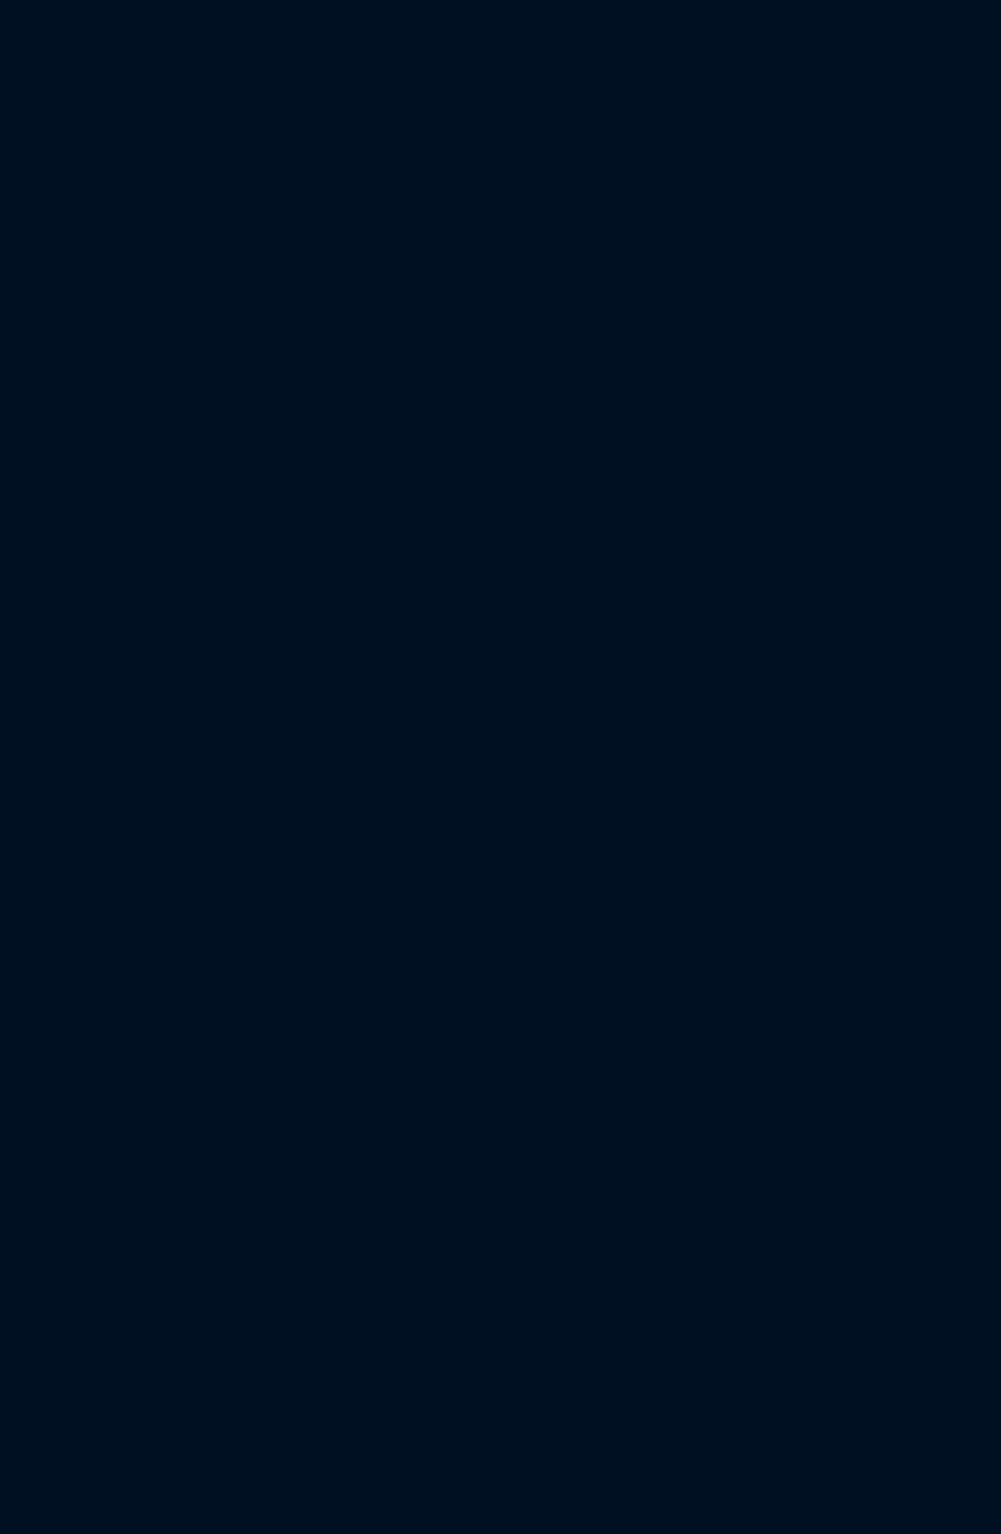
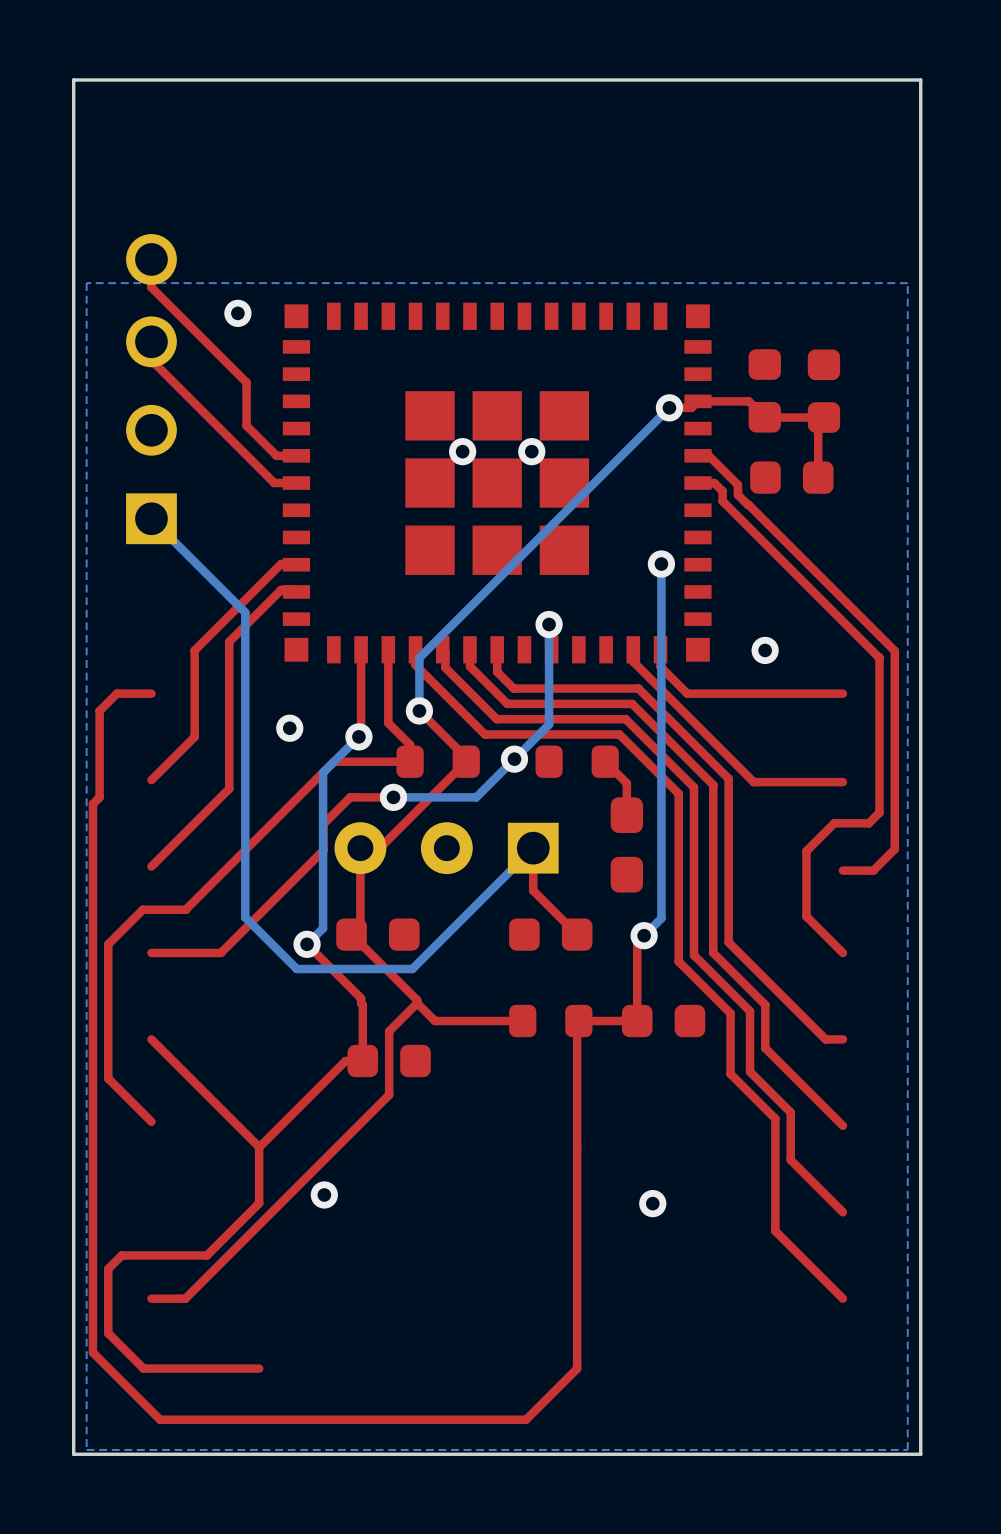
board edge: none -> (920, 80) (73, 80) (73, 1454) (920, 1454) (920, 80)
top track: none -> (151, 259) (151, 287) (246, 382) (246, 425) (276, 455) (296, 455)
bottom zone outline: none -> (907, 283) (907, 1449) (86, 1449) (86, 283) (907, 283)
via: none -> (237, 313)
top track: none -> (151, 341) (151, 360) (274, 483) (296, 483)
part: none -> (151, 389)
part: none -> (764, 390)
part: none -> (823, 391)
top track: none -> (669, 407) (691, 407) (697, 401) (748, 401) (765, 417) (823, 417) (818, 423) (818, 477)
bottom track: none -> (669, 407) (419, 657) (419, 710)
via: none -> (669, 407)
via: none -> (462, 451)
via: none -> (531, 451)
top track: none -> (697, 455) (708, 455) (737, 484) (737, 494) (894, 650) (894, 849) (873, 870) (842, 870)
part: none -> (791, 477)
part: none -> (497, 483)
top track: none -> (697, 483) (714, 483) (722, 491) (722, 501) (879, 658)
bottom track: none -> (151, 518) (245, 612) (245, 917) (296, 968) (412, 968) (533, 848)
top track: none -> (296, 564) (281, 564) (194, 650) (194, 736) (151, 780)
bottom track: none -> (661, 564) (661, 918) (644, 935)
via: none -> (661, 564)
top track: none -> (296, 591) (294, 589) (281, 589) (229, 641) (229, 788) (151, 866)
bottom track: none -> (549, 624) (549, 724) (476, 797) (393, 797)
via: none -> (549, 624)
top track: none -> (361, 649) (361, 734) (358, 736)
top track: none -> (388, 649) (388, 723) (410, 744) (410, 761) (333, 761) (186, 909)
top track: none -> (415, 649) (415, 665) (484, 734) (619, 734) (678, 793) (678, 961) (730, 1013) (730, 1073) (775, 1118) (775, 1231) (842, 1298)
top track: none -> (442, 649) (445, 652) (445, 667) (496, 719) (625, 719) (694, 787) (694, 955) (750, 1011) (750, 1071) (790, 1112) (790, 1160) (842, 1212)
top track: none -> (469, 649) (469, 666) (507, 703) (632, 703) (713, 785) (713, 952) (765, 1004) (765, 1048) (842, 1125)
top track: none -> (497, 649) (497, 672) (513, 688) (638, 688) (728, 778) (728, 942) (825, 1039) (842, 1039)
top track: none -> (633, 649) (633, 661) (753, 782) (842, 782)
top track: none -> (660, 649) (660, 666) (687, 693) (842, 693)
via: none -> (765, 650)
top track: none -> (879, 657) (879, 812) (868, 823) (834, 823) (806, 851) (806, 916) (842, 952)
top track: none -> (151, 693) (116, 693) (99, 710) (99, 797) (92, 804) (92, 1352) (160, 1419) (526, 1419) (577, 1368) (577, 1022) (578, 1021) (637, 1021) (637, 942) (644, 935)
top track: none -> (419, 710) (466, 757) (466, 761) (379, 848) (360, 848) (360, 925) (351, 934) (417, 1000) (417, 1003)
via: none -> (419, 710)
via: none -> (289, 728)
bottom track: none -> (358, 736) (323, 772) (323, 928) (307, 944)
via: none -> (358, 736)
via: none -> (514, 759)
part: none -> (438, 761)
part: none -> (577, 761)
top track: none -> (605, 761) (626, 783) (626, 815)
top track: none -> (393, 797) (350, 797) (323, 824) (323, 850) (220, 952) (151, 952)
via: none -> (393, 797)
part: none -> (626, 844)
part: none -> (446, 848)
top track: none -> (533, 848) (533, 890) (577, 934)
top track: none -> (186, 909) (142, 909) (108, 944) (108, 1078) (151, 1121)
part: none -> (377, 934)
part: none -> (550, 934)
via: none -> (644, 935)
top track: none -> (307, 944) (361, 998) (362, 1004) (362, 1061) (345, 1061) (259, 1147)
via: none -> (307, 944)
top track: none -> (417, 1003) (435, 1021) (522, 1021)
top track: none -> (417, 1003) (389, 1031) (389, 1094) (185, 1298) (151, 1298)
part: none -> (550, 1021)
part: none -> (663, 1021)
top track: none -> (151, 1039) (259, 1147) (259, 1203) (206, 1255) (121, 1255) (108, 1268) (108, 1333) (143, 1368) (259, 1368)
part: none -> (389, 1061)
via: none -> (324, 1194)
via: none -> (652, 1203)

